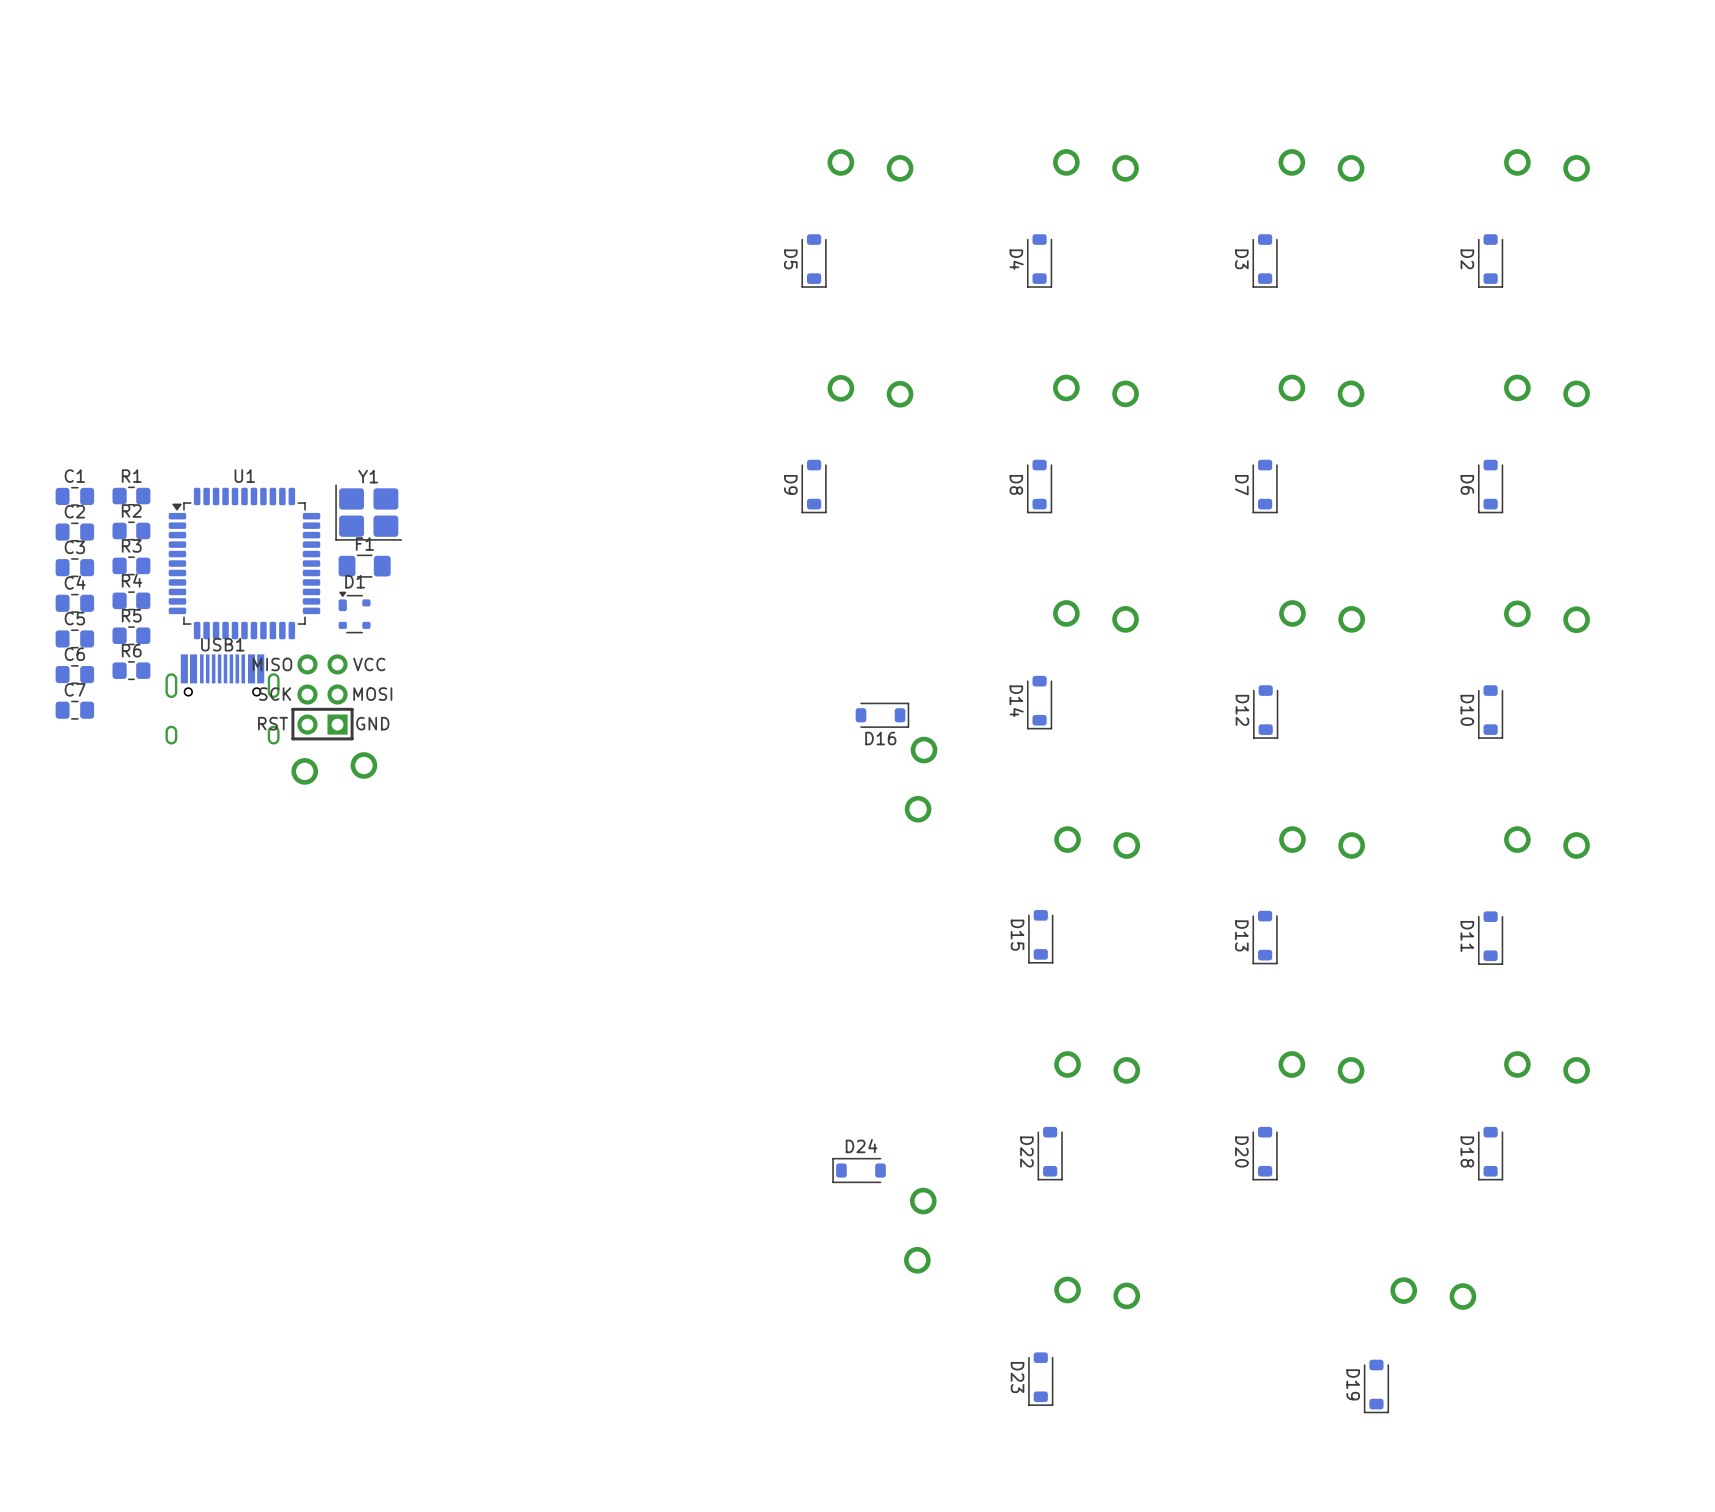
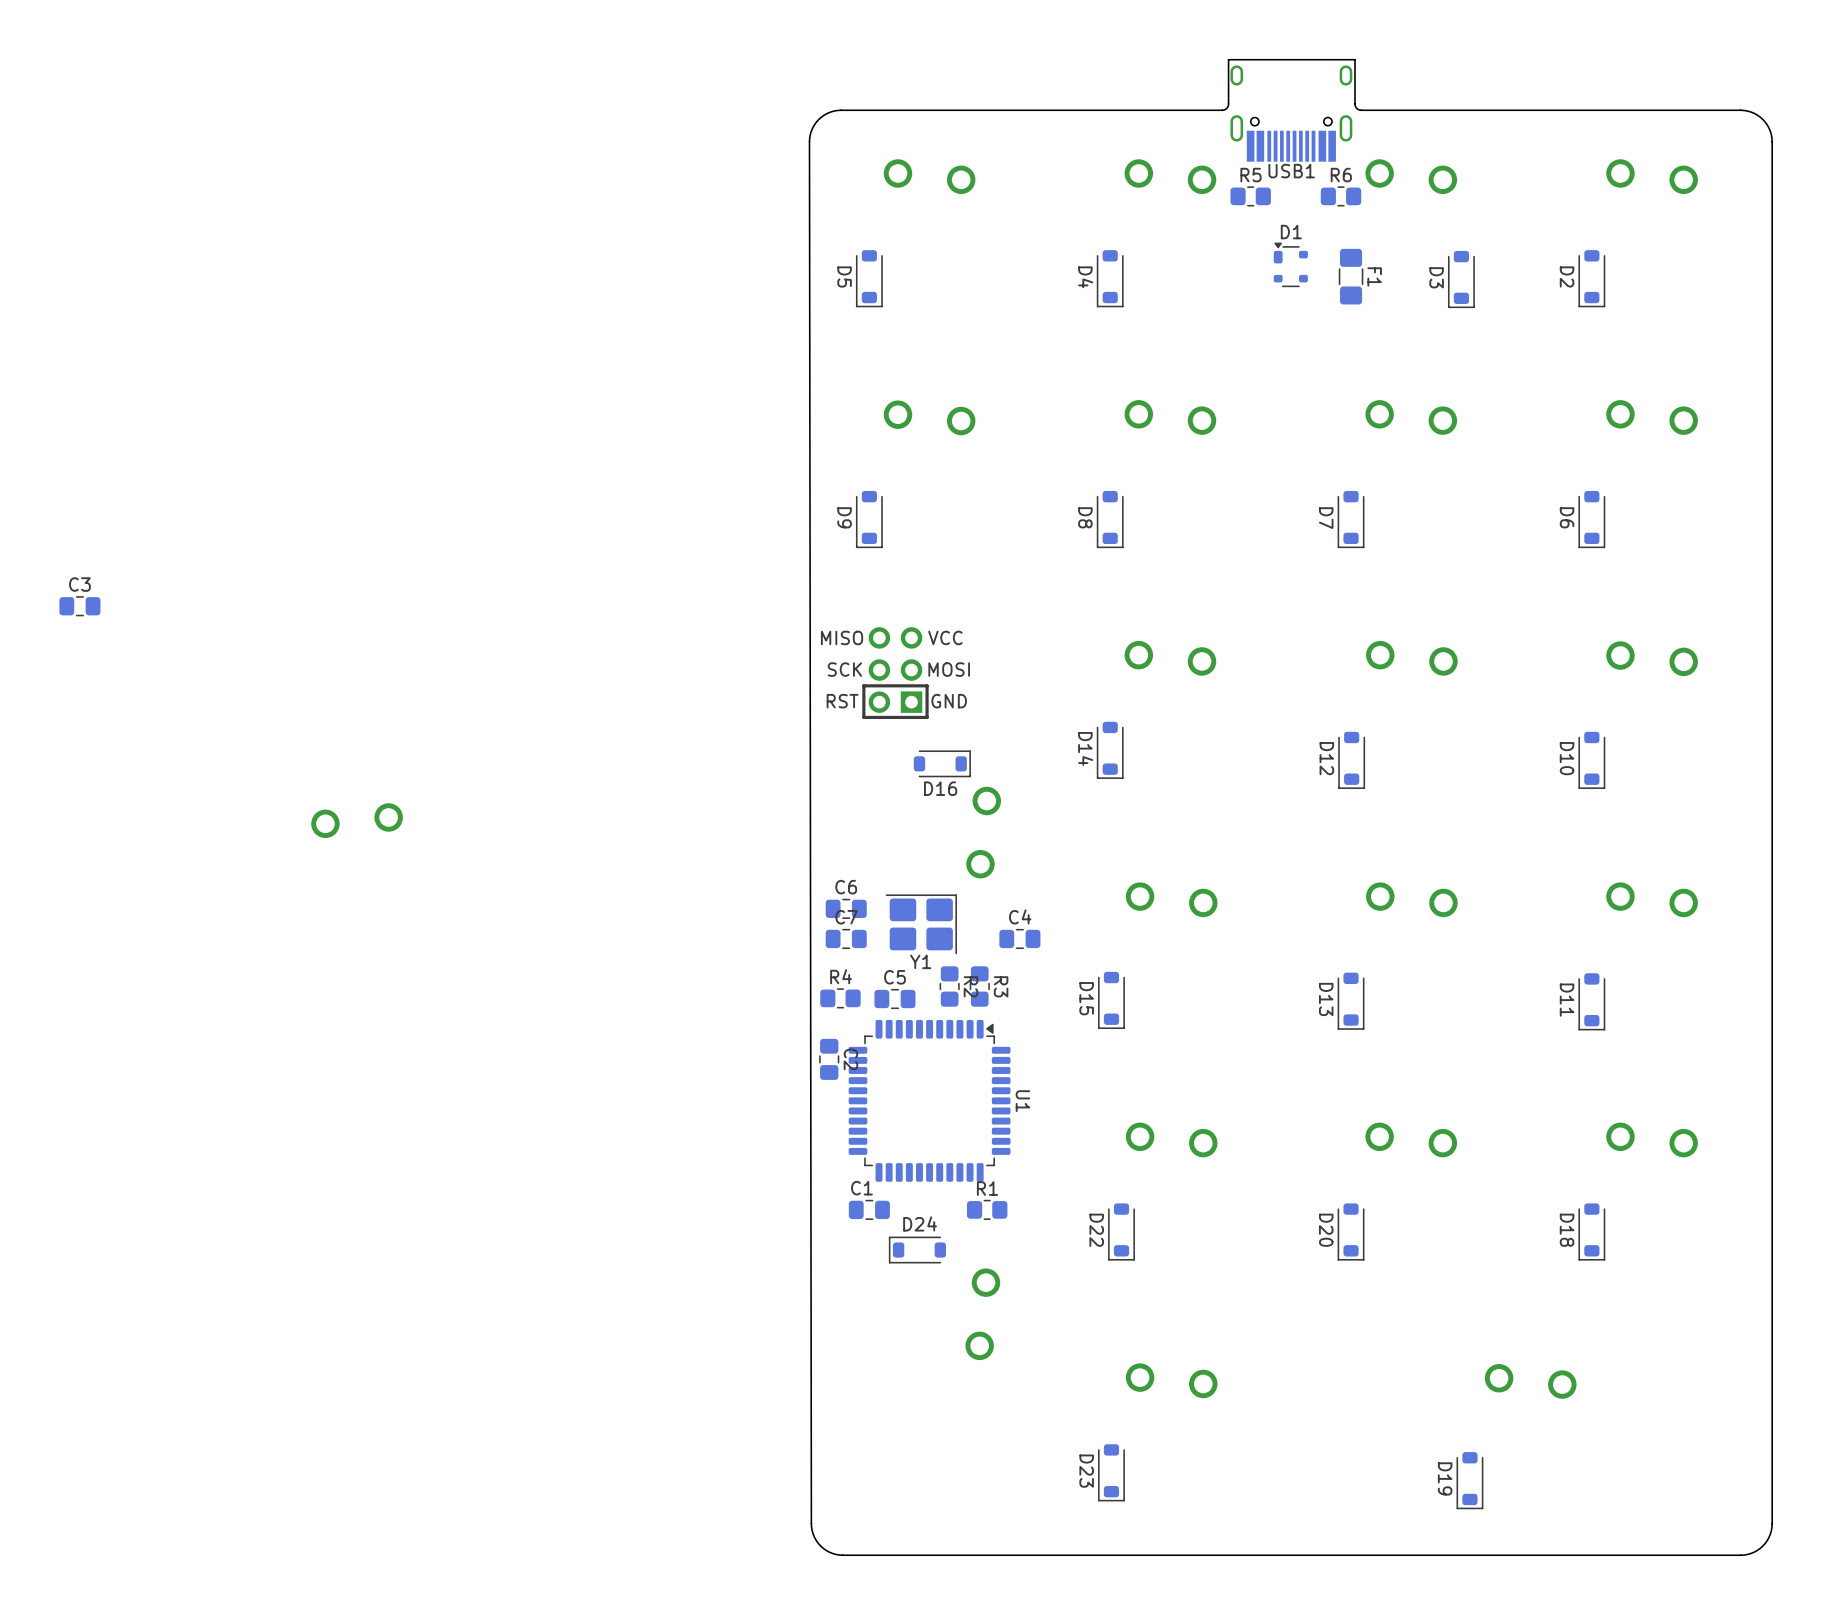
board edge: none -> (1354, 59) (1228, 59) (1228, 104) (1223, 110) (841, 110) (830, 112) (821, 117) (811, 131) (809, 141) (811, 1523) (813, 1534) (818, 1543) (832, 1553) (842, 1555) (1740, 1555) (1751, 1553) (1760, 1548) (1770, 1534) (1772, 1523) (1771, 134) (1762, 119) (1754, 113) (1744, 110) (1360, 110) (1355, 104) (1354, 59)
D3 position: (1265, 260) -> (1461, 279)
C1 name position: C1 (74, 476) -> C1 (861, 1188)
C1 position: (74, 496) -> (869, 1209)
R1 position: (131, 496) -> (987, 1209)
Y1 rotation: 0° (368, 512) -> 180° (921, 924)
Y1 position: (368, 512) -> (921, 924)
R2 rotation: 0° (131, 530) -> 90° clockwise (949, 986)
R2 position: (131, 530) -> (949, 986)
C2 rotation: 0° (74, 532) -> 90° clockwise (829, 1059)
C2 position: (74, 532) -> (829, 1059)
U1 rotation: 0° (244, 563) -> 90° clockwise (929, 1100)
U1 position: (244, 563) -> (929, 1100)
R3 rotation: 0° (131, 565) -> 90° clockwise (979, 986)
R3 position: (131, 565) -> (979, 986)
F1 rotation: 0° (364, 566) -> 90° clockwise (1351, 276)
F1 position: (364, 566) -> (1351, 276)
R4 position: (131, 600) -> (840, 998)
C4 position: (74, 603) -> (1019, 938)
D1 position: (354, 612) -> (1290, 264)
part: none -> (895, 673)
R5 position: (131, 635) -> (1250, 196)
C5 position: (74, 638) -> (894, 999)
R6 position: (131, 670) -> (1341, 196)
C6 position: (74, 674) -> (846, 908)
part: (322, 697) -> none
USB1 rotation: 0° (222, 699) -> 180° (1291, 113)
USB1 position: (222, 699) -> (1291, 113)
C7 position: (74, 710) -> (846, 938)

